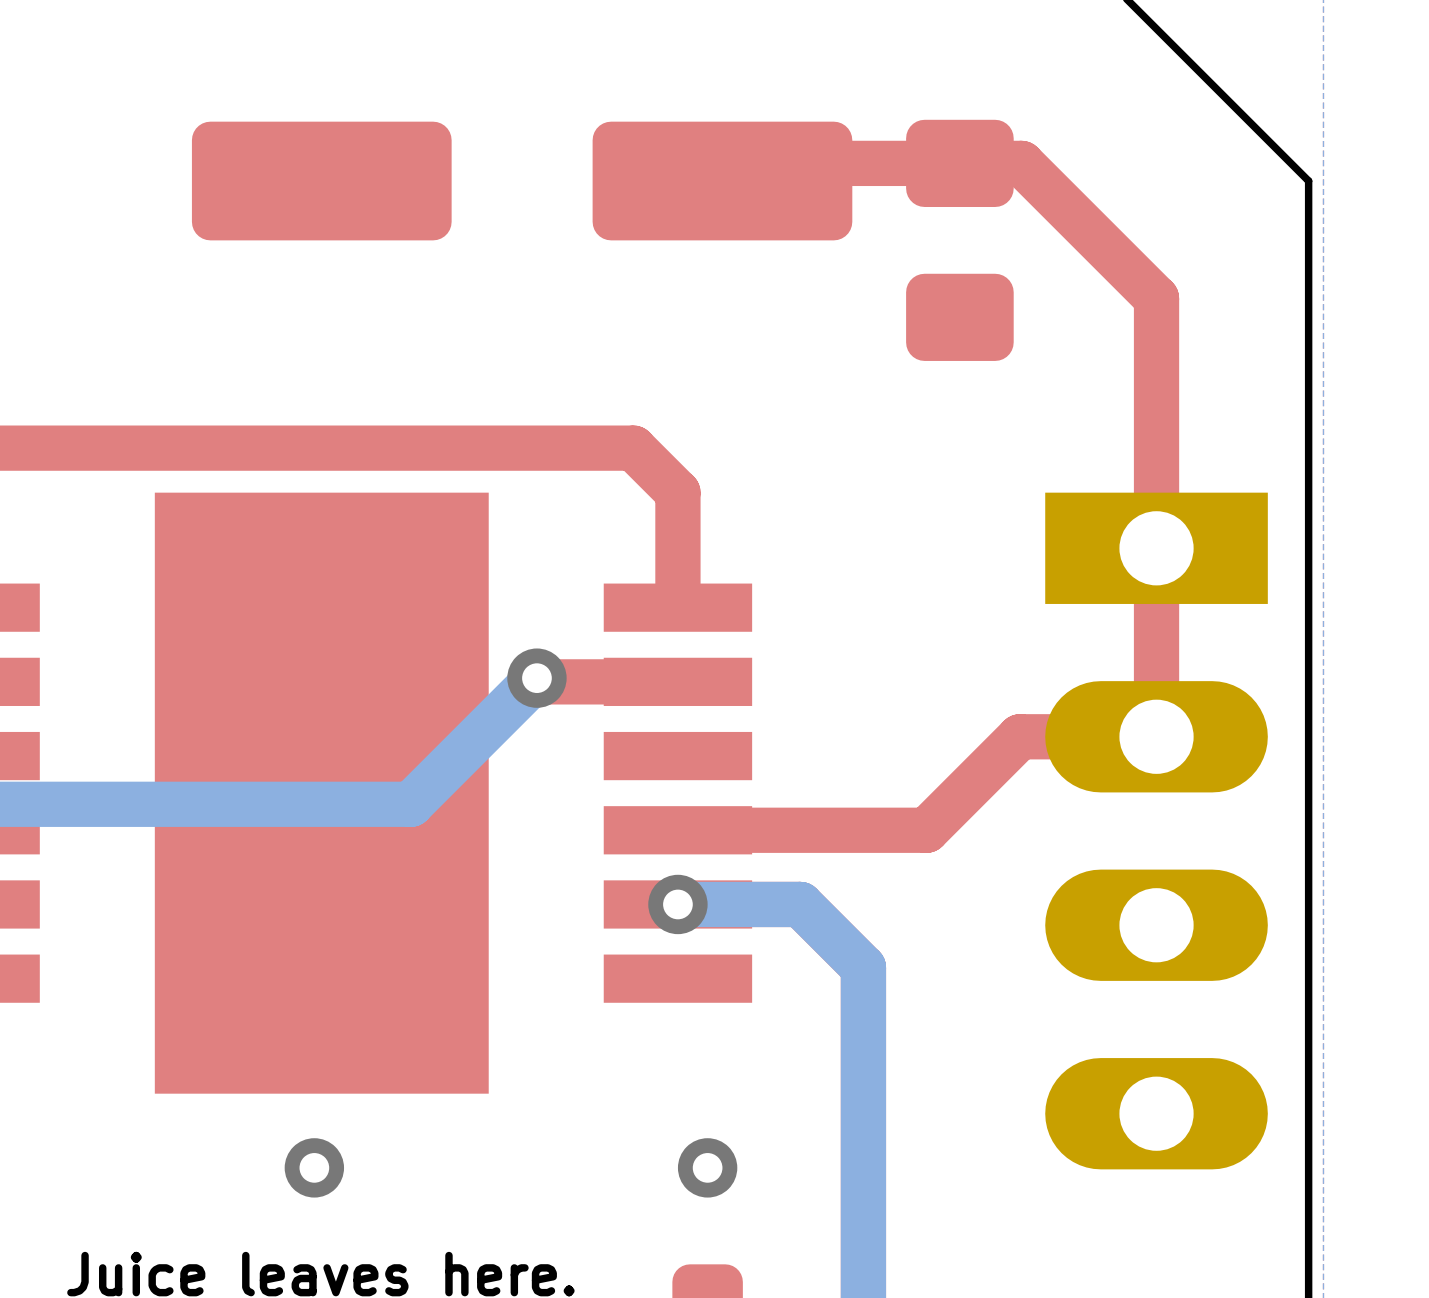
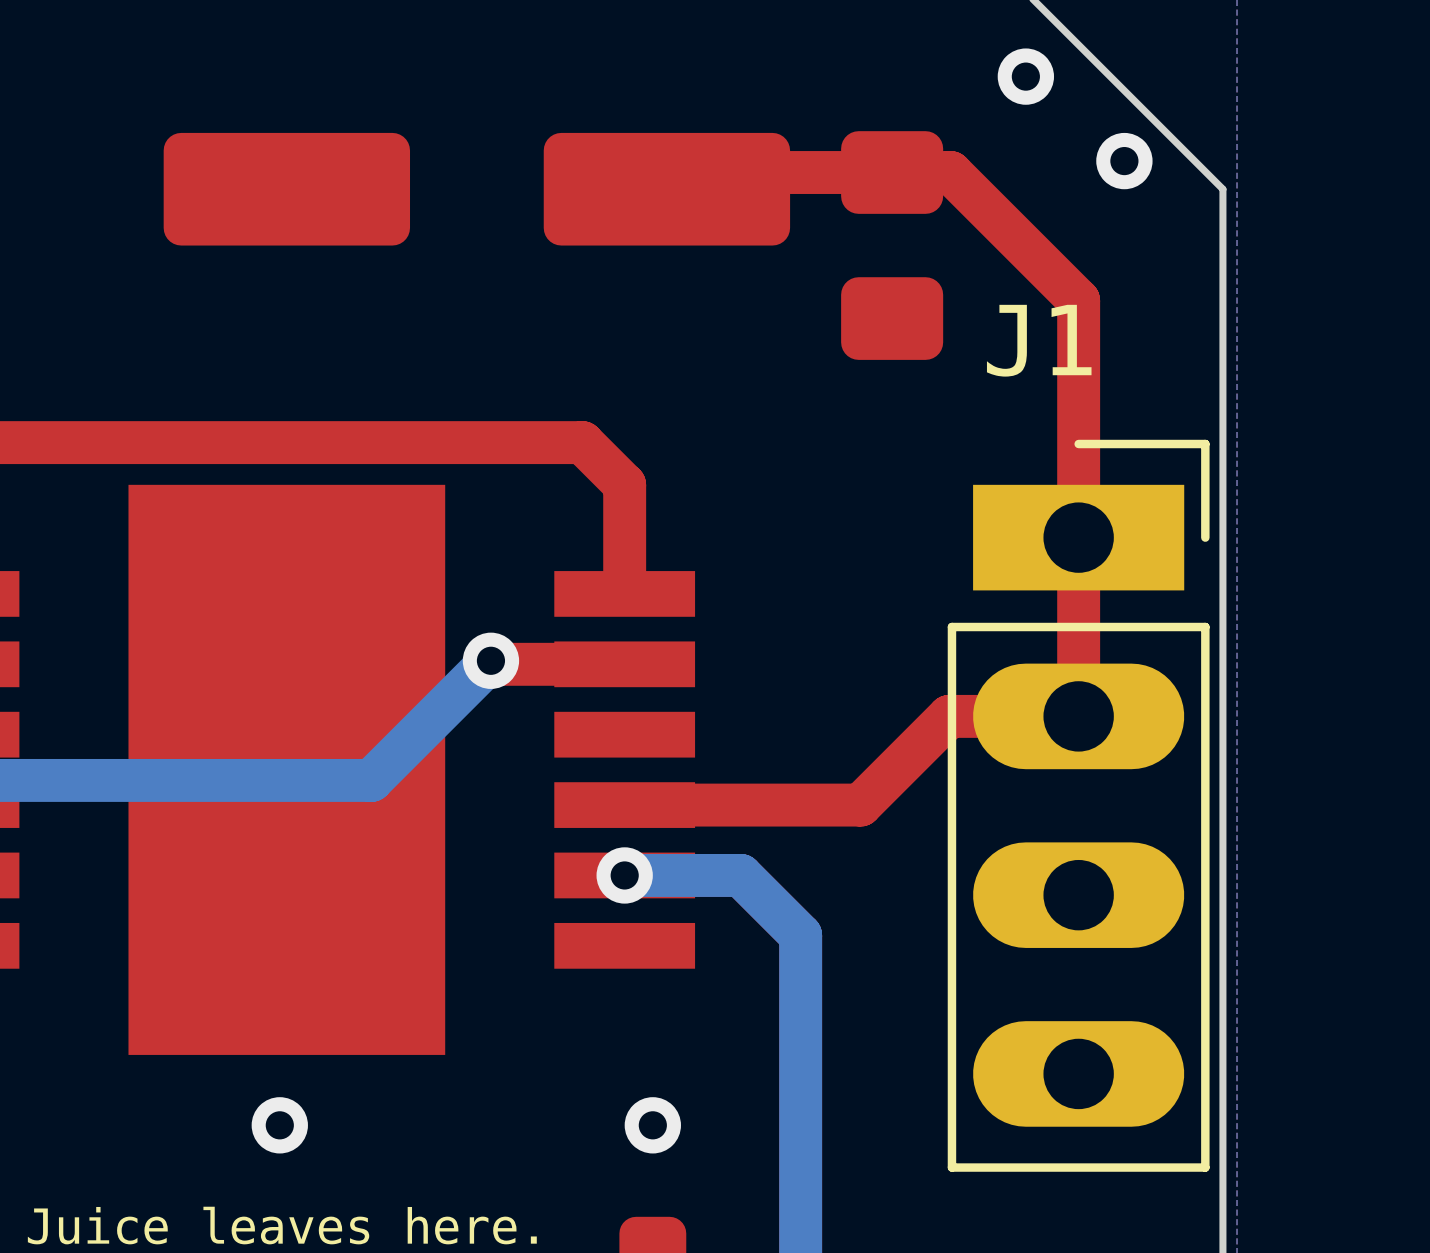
via: none -> (1025, 76)
via: none -> (1124, 161)
J1 side: top (1156, 831) -> bottom (1078, 805)

